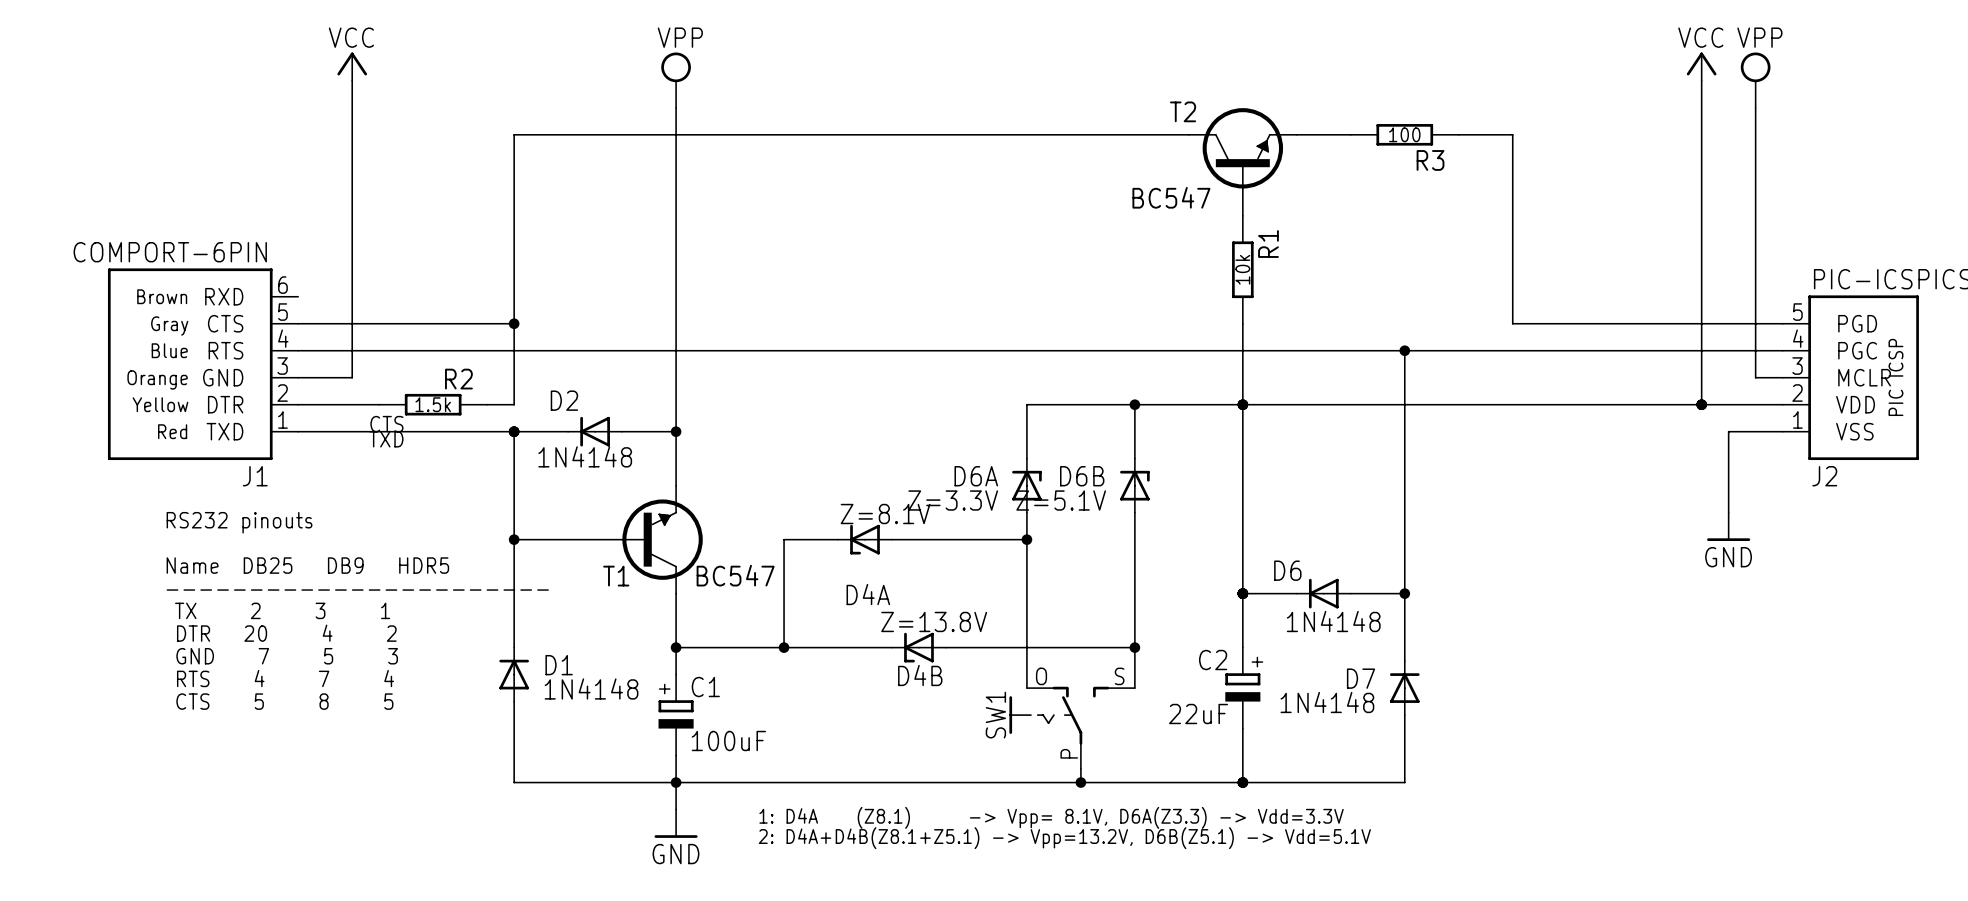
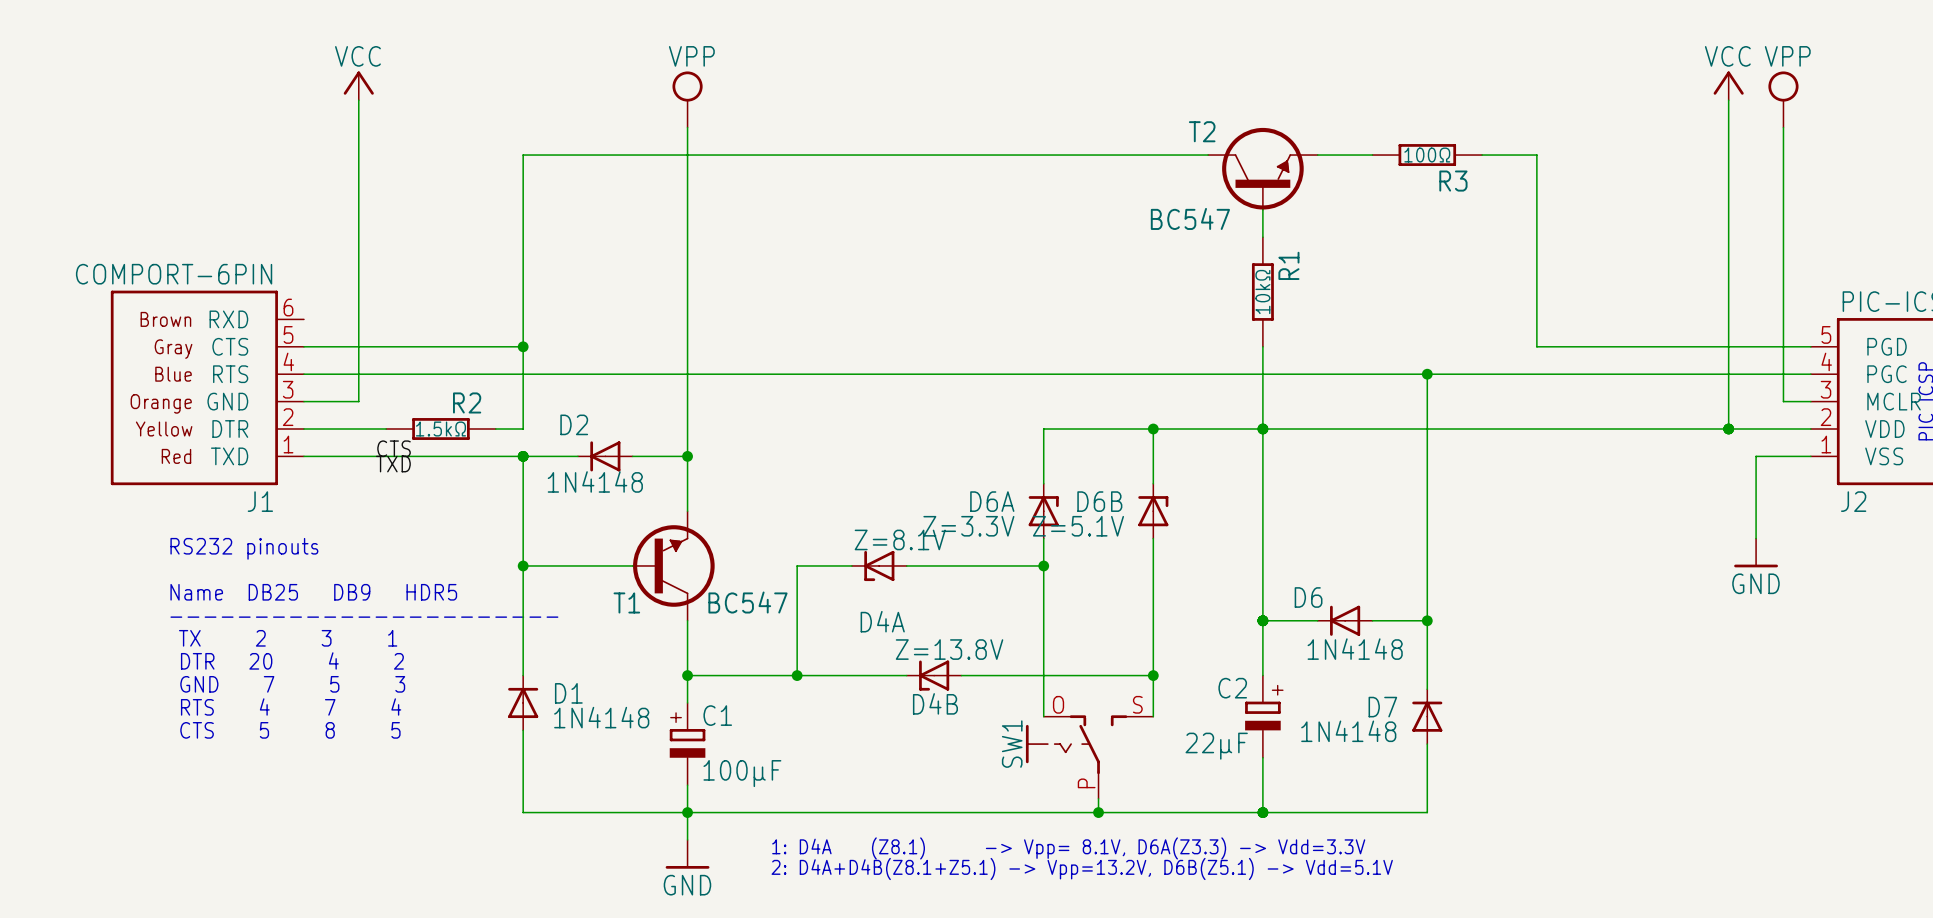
R3 value: 100 (1404, 134) -> 100Ω (1427, 155)
R1 value: 10k (1242, 269) -> 10kΩ (1262, 292)
R2 value: 1.5k (433, 404) -> 1.5kΩ (440, 428)
C2 value: 22uF (1198, 714) -> 22μF (1216, 746)
C1 value: 100uF (728, 740) -> 100μF (742, 773)

